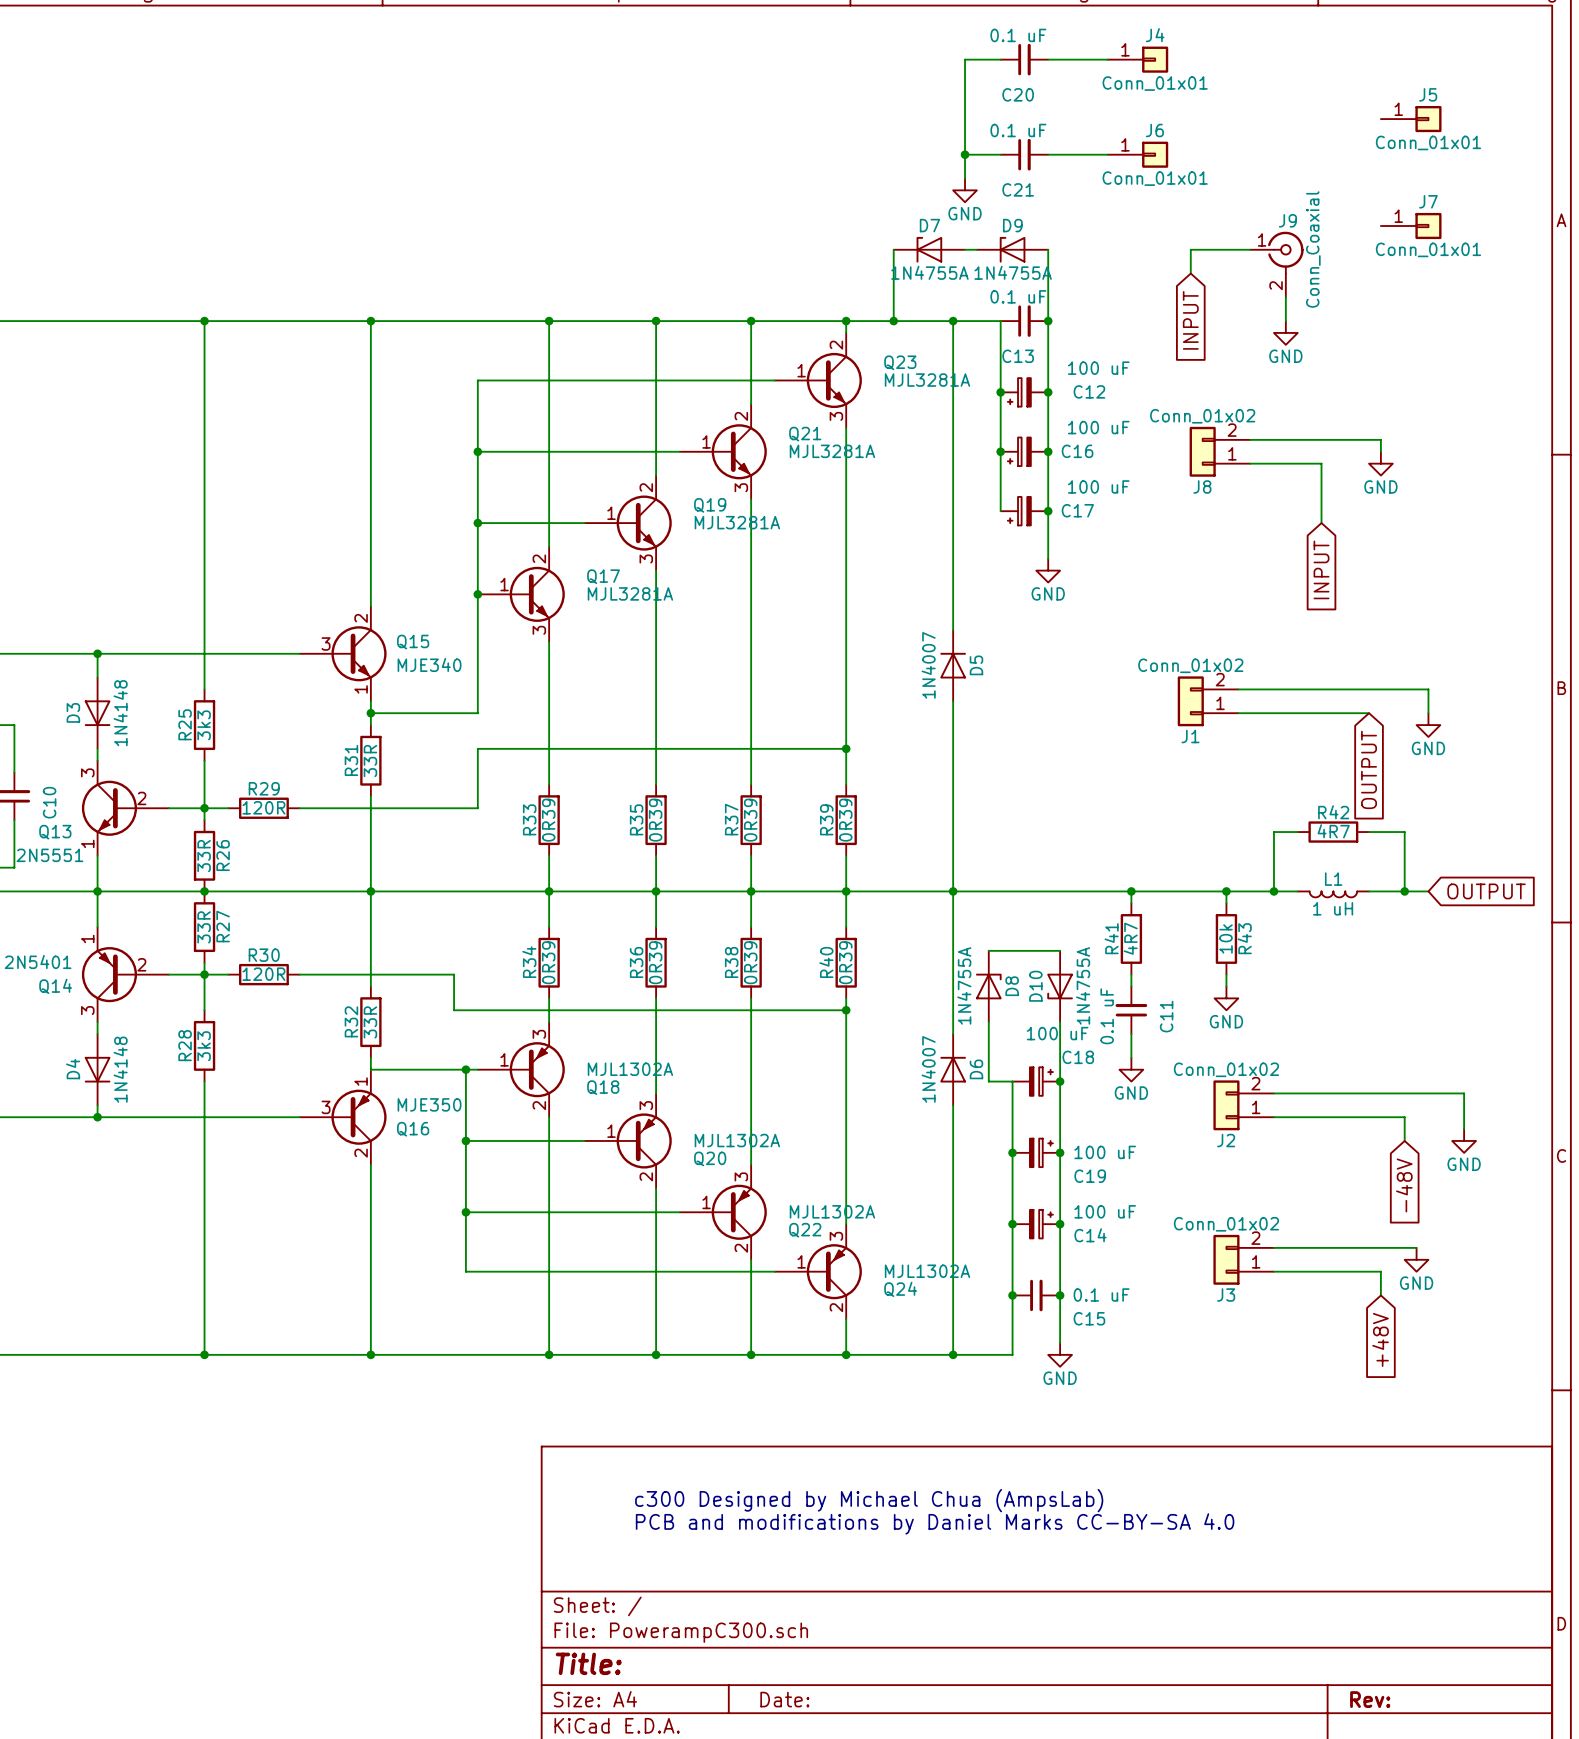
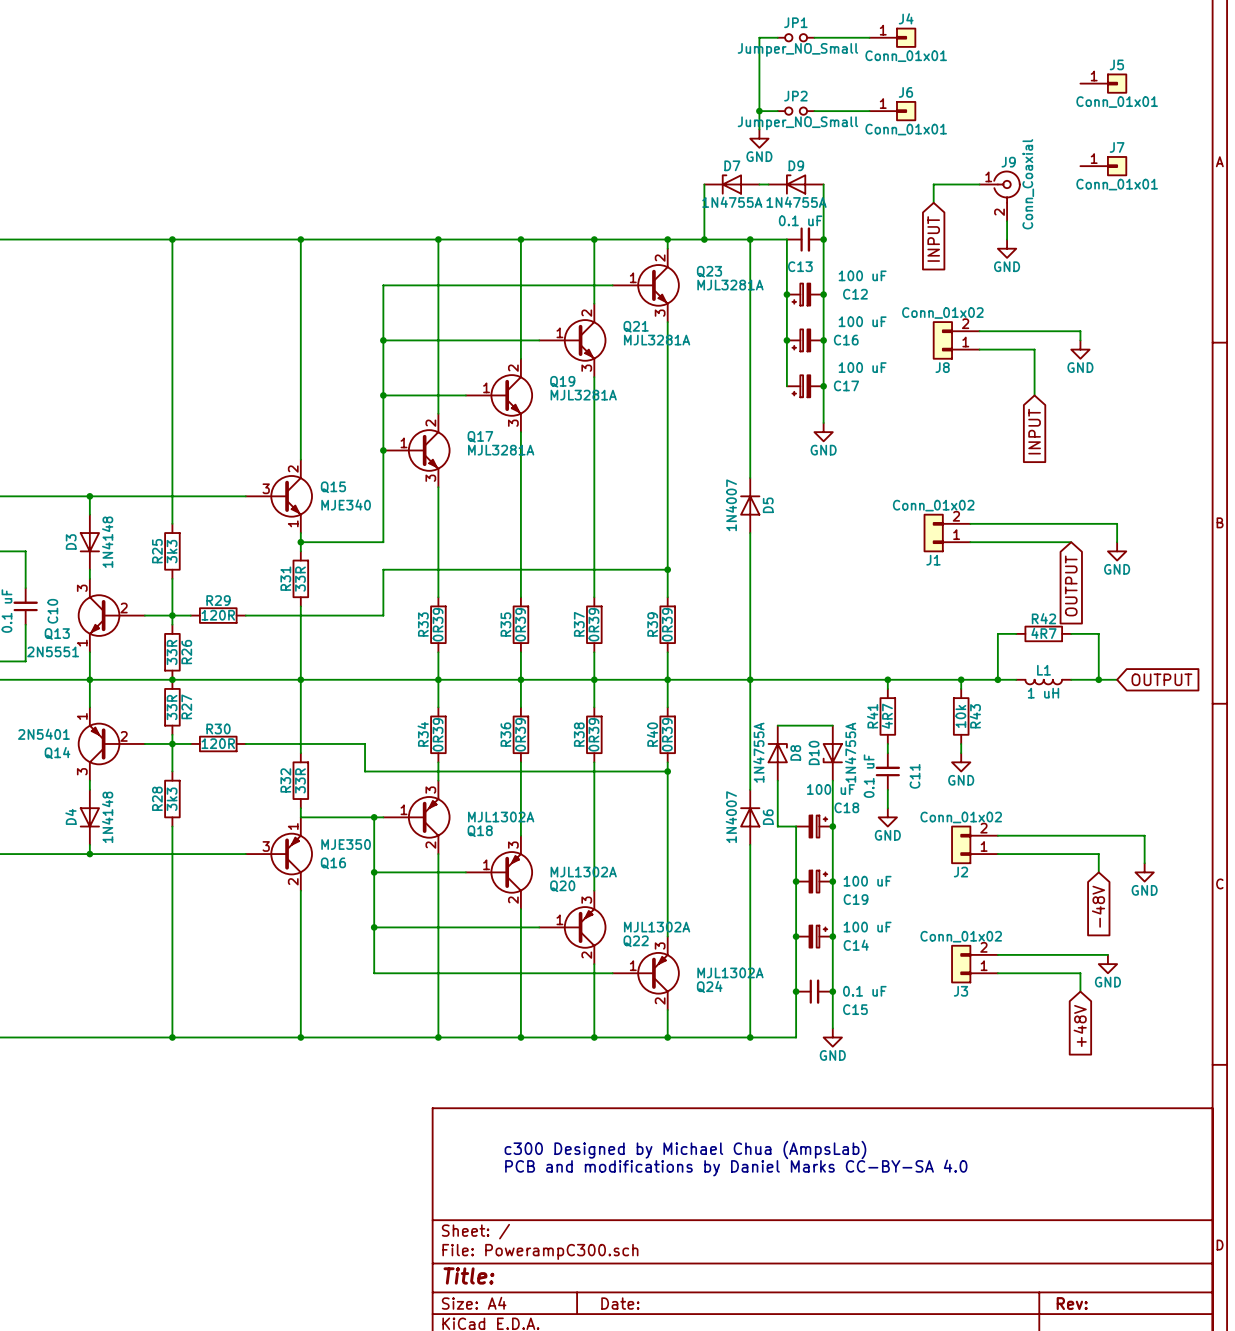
JP1: none -> Jumper_NO_Small (796, 37)
C20: 0.1 uF (1024, 59) -> none
JP2: none -> Jumper_NO_Small (796, 111)
C21: 0.1 uF (1024, 154) -> none

